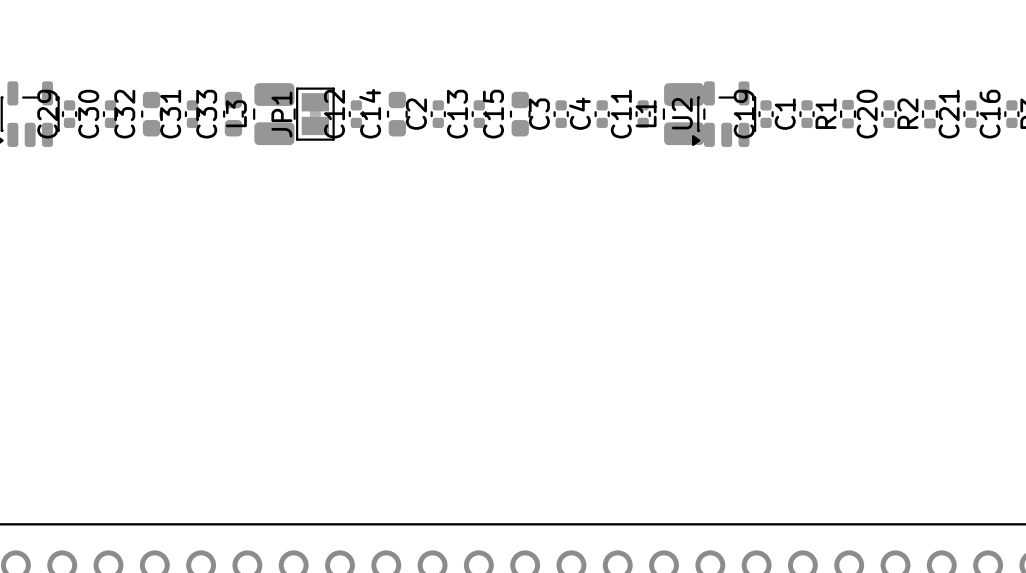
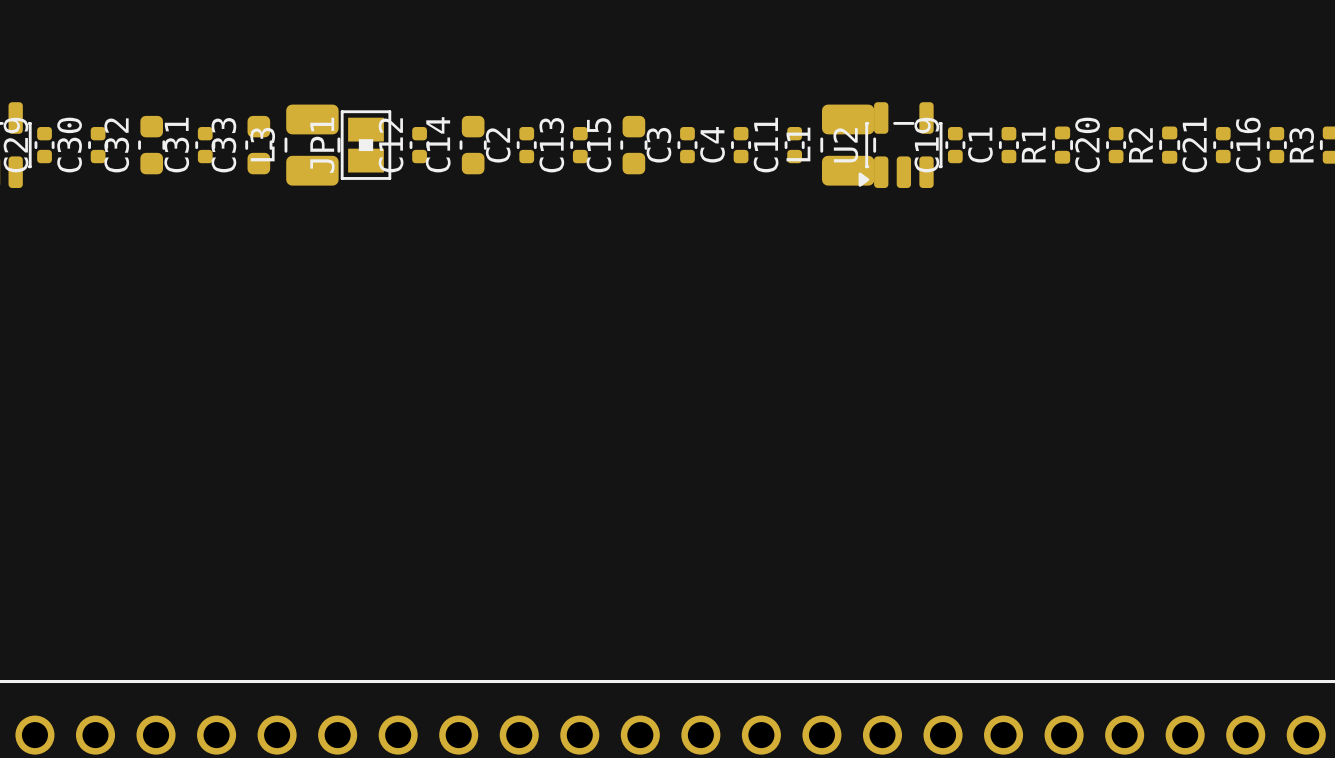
JP1 footprint: [296, 87, 335, 141] -> [340, 110, 392, 180]

